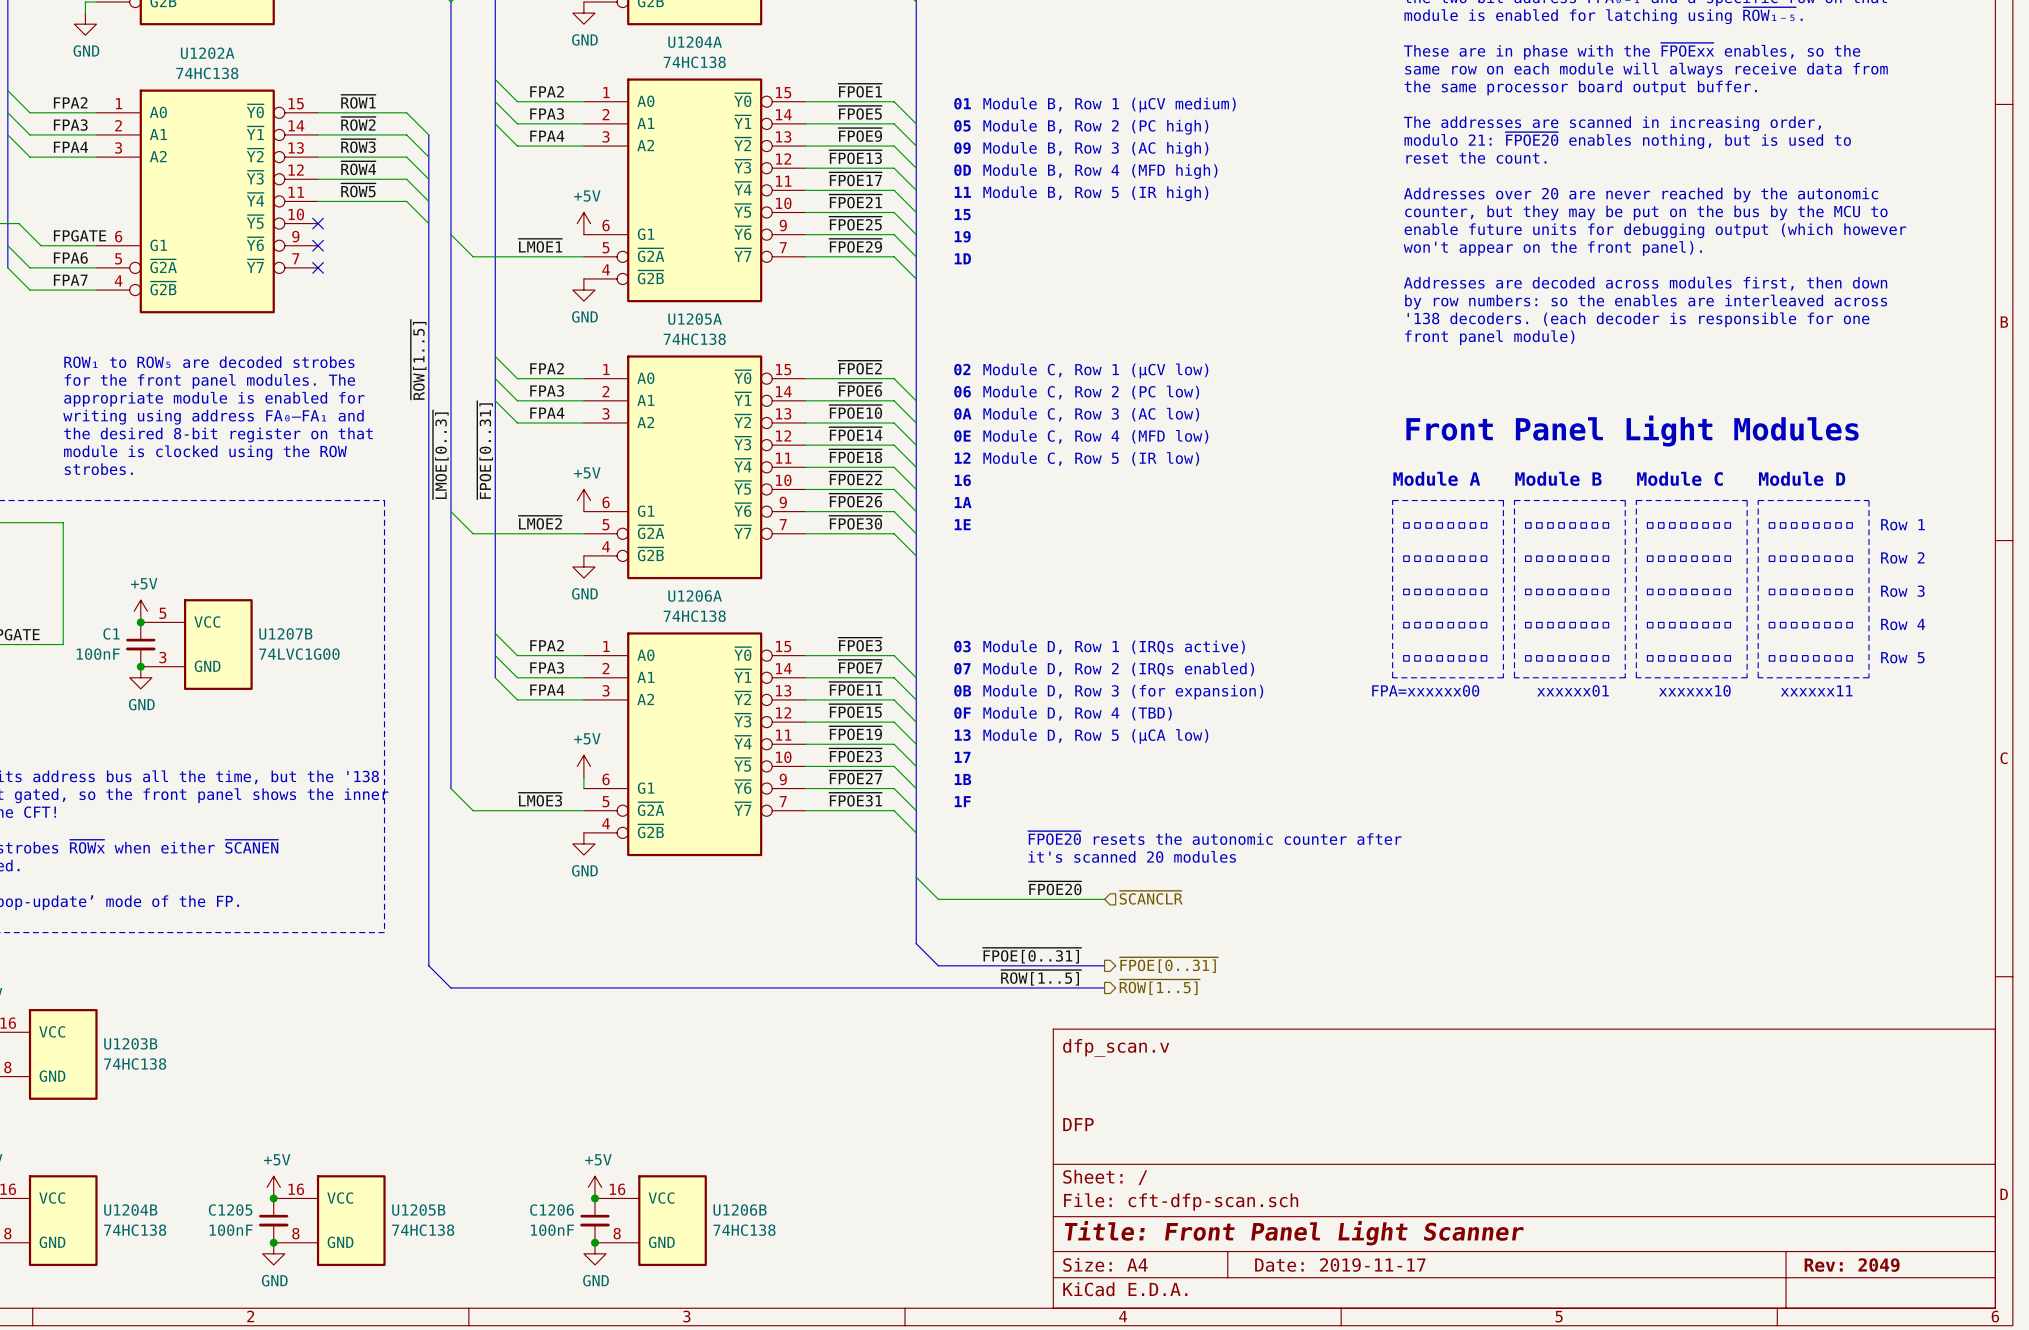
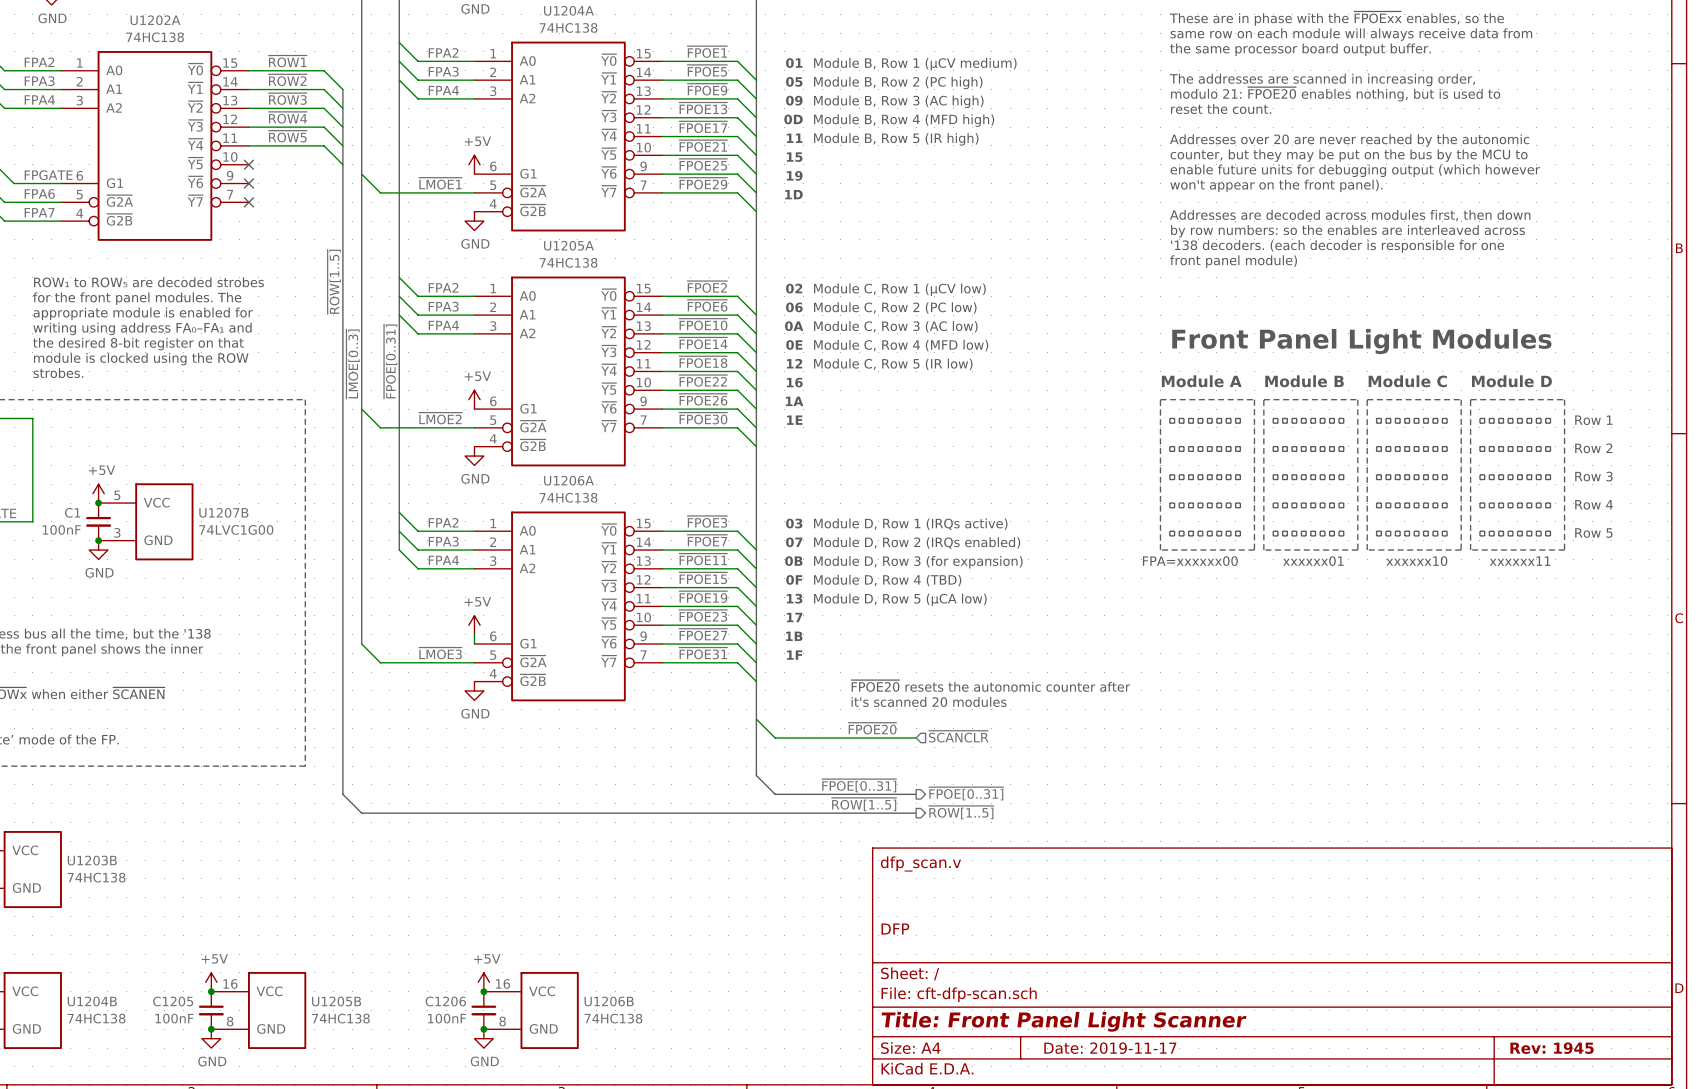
title block: Rev: 2049 (1852, 1265) -> Rev: 1945 (1552, 1048)

